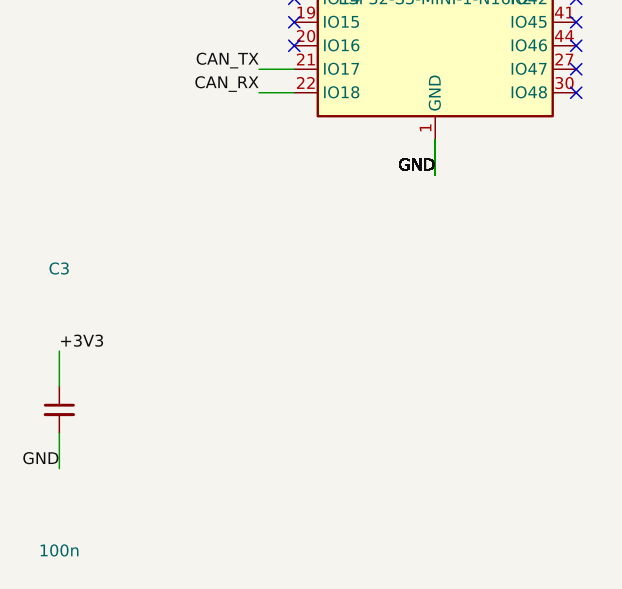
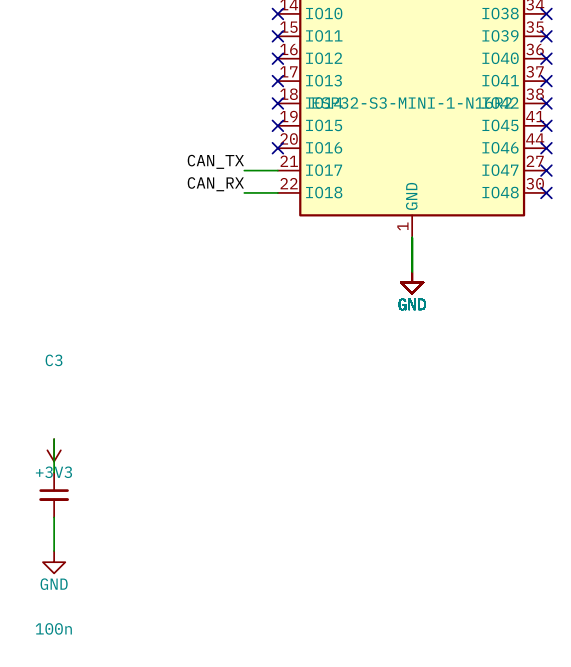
label: GND (416, 164) -> none
power symbol: none -> GND (412, 282)
label: +3V3 (82, 340) -> none
power symbol: none -> +3V3 (54, 450)
label: GND (40, 458) -> none
power symbol: none -> GND (54, 562)

